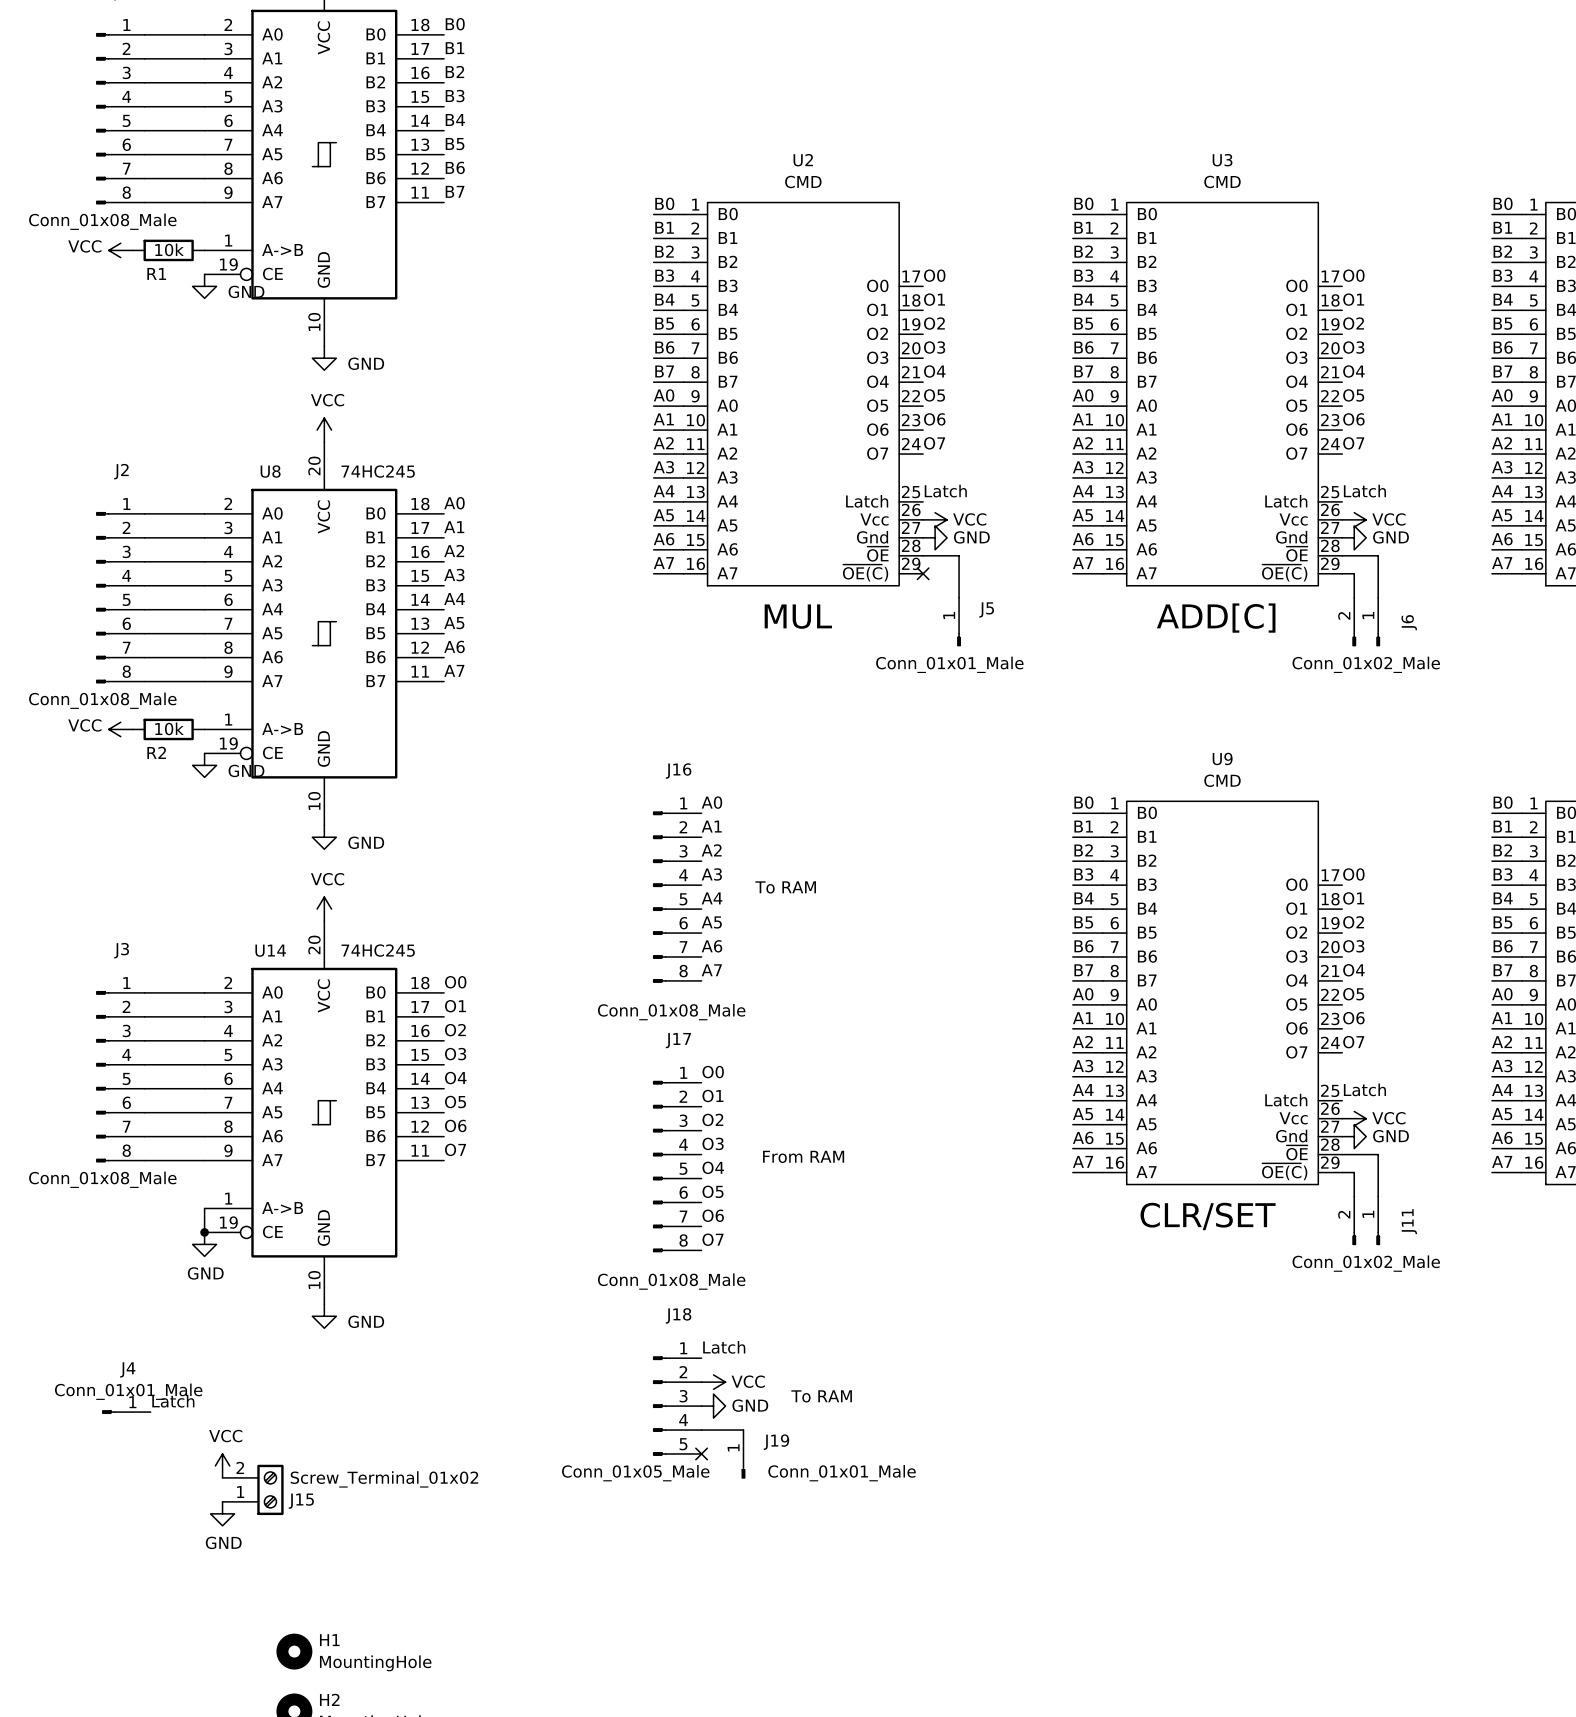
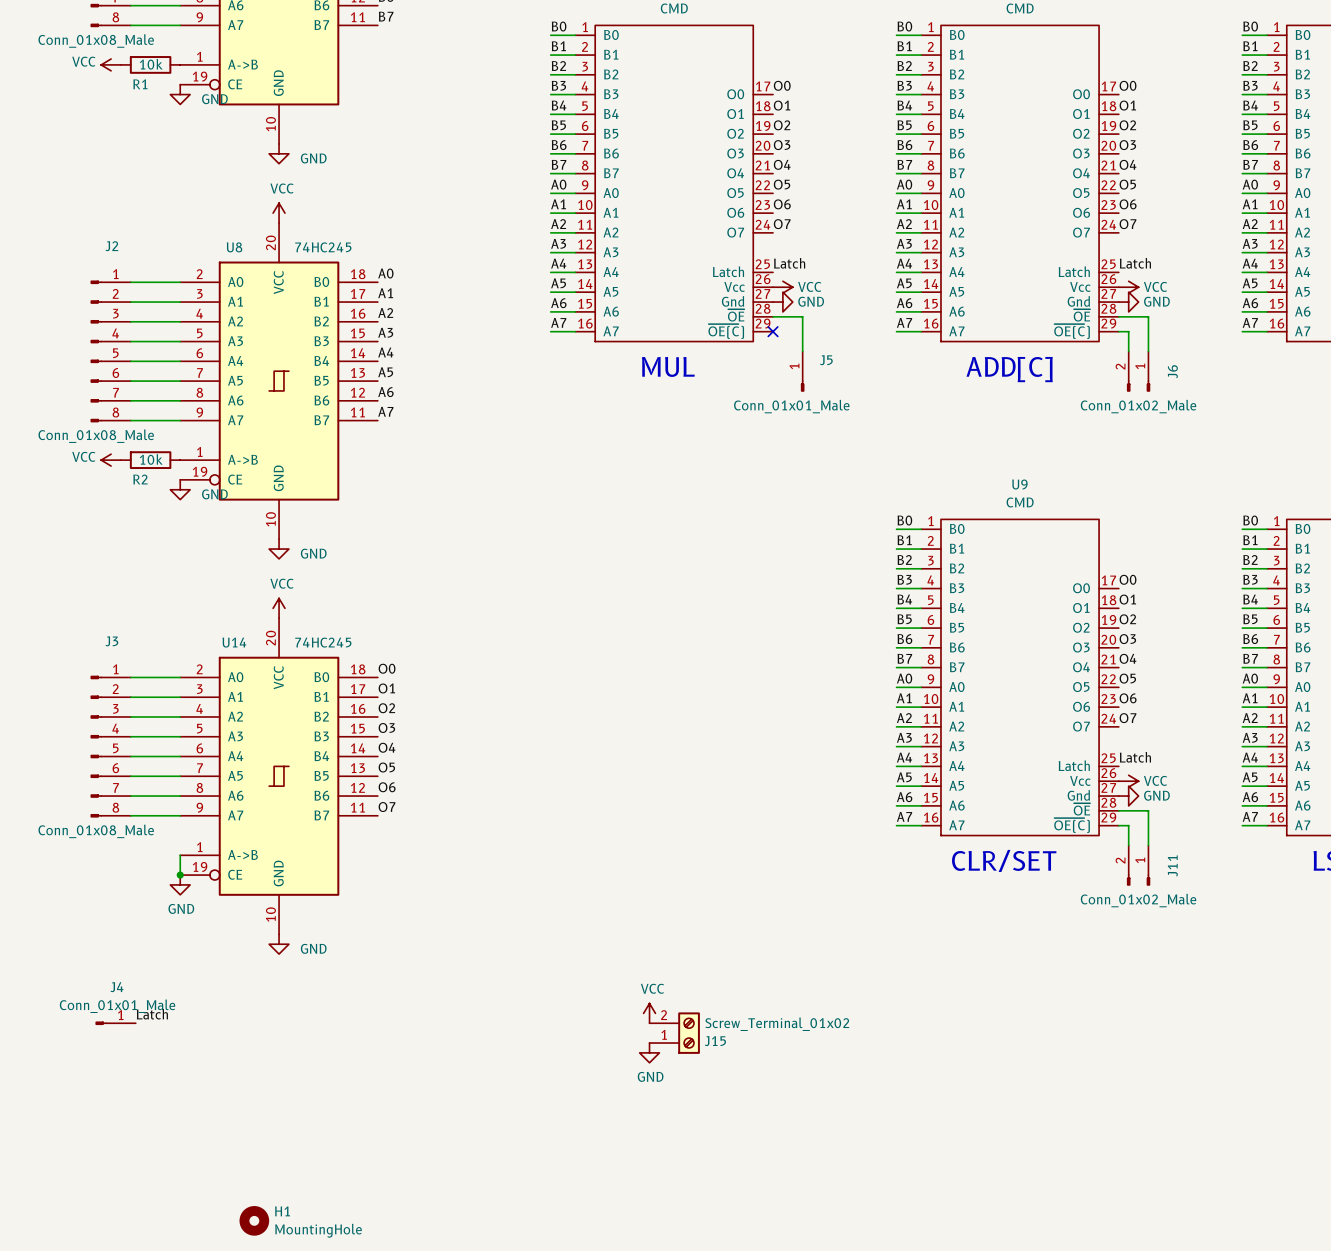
label: A0 (711, 802) -> none
label: A1 (711, 826) -> none
label: A2 (711, 850) -> none
label: A3 (711, 874) -> none
text: To RAM (785, 887) -> none
J16: Conn_01x08_Male (677, 897) -> none
label: A4 (712, 898) -> none
label: A5 (711, 922) -> none
label: A6 (711, 946) -> none
label: A7 (711, 970) -> none
label: O0 (713, 1072) -> none
label: O1 (712, 1096) -> none
label: O2 (712, 1119) -> none
label: O3 (713, 1143) -> none
text: From RAM (803, 1156) -> none
J17: Conn_01x08_Male (677, 1166) -> none
label: O4 (713, 1167) -> none
label: O5 (713, 1191) -> none
label: O6 (713, 1215) -> none
label: O7 (713, 1239) -> none
label: Latch (724, 1347) -> none
power symbol rotation: 0° (713, 1382) -> 90° counterclockwise (649, 1013)
power symbol position: VCC (713, 1382) -> VCC (649, 1013)
text: To RAM (821, 1396) -> none
J18: Conn_01x05_Male (677, 1406) -> none
power symbol rotation: 0° (713, 1406) -> 90° clockwise (649, 1052)
power symbol position: GND (713, 1406) -> GND (649, 1052)
wire: (701, 1430) (743, 1430) -> none
no-connect mark: (701, 1453) -> none
J19: Conn_01x01_Male (743, 1454) -> none
power symbol: VCC (222, 1465) -> none
J15 position: (253, 1489) -> (674, 1033)
power symbol: GND (222, 1513) -> none

